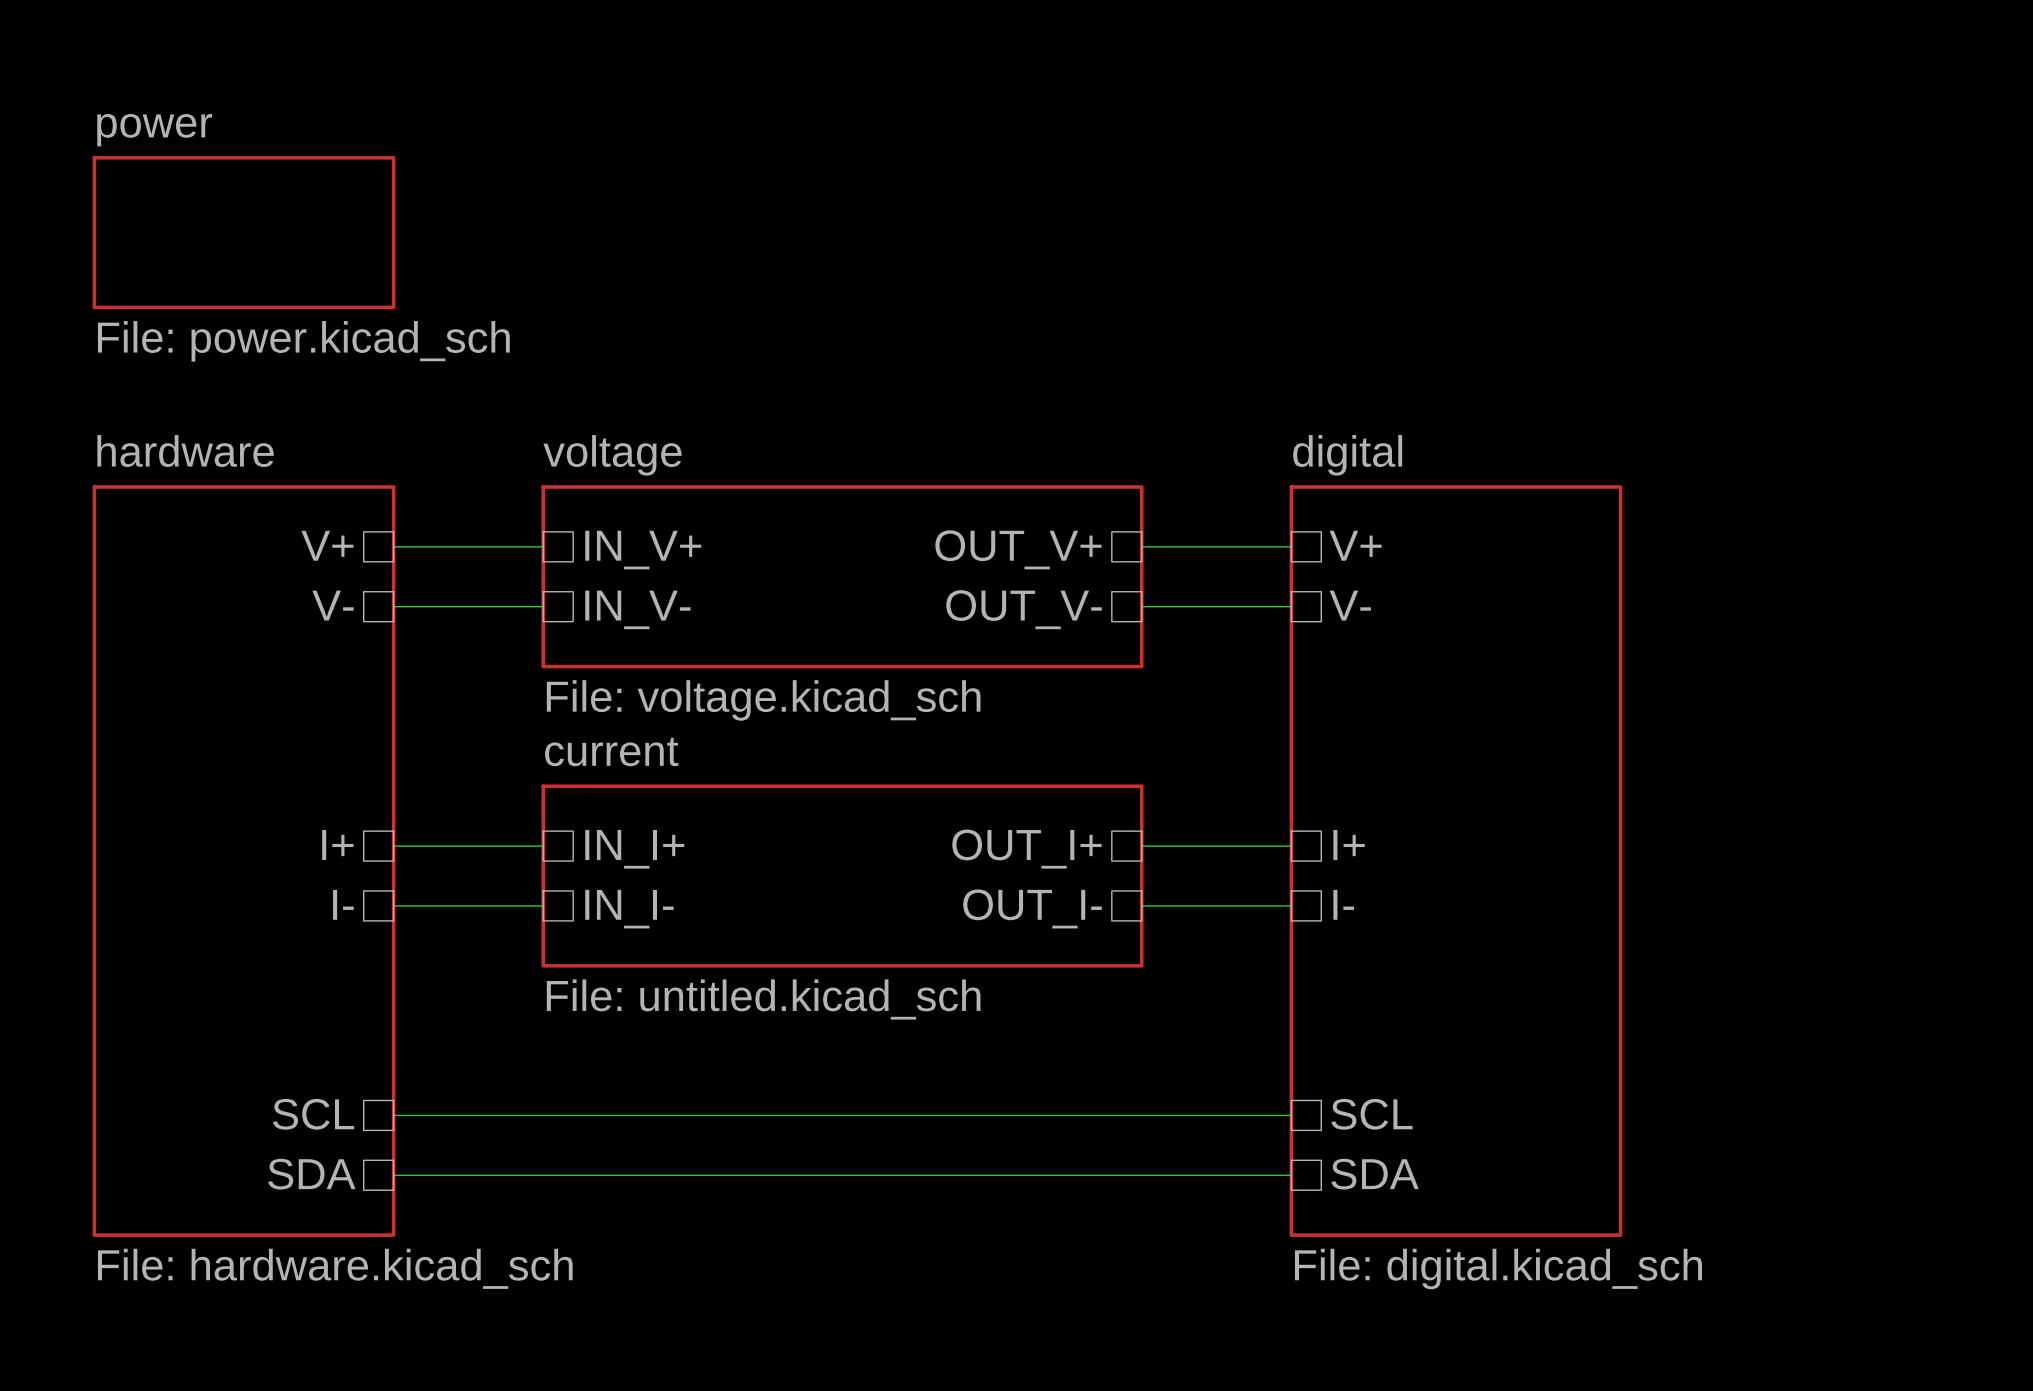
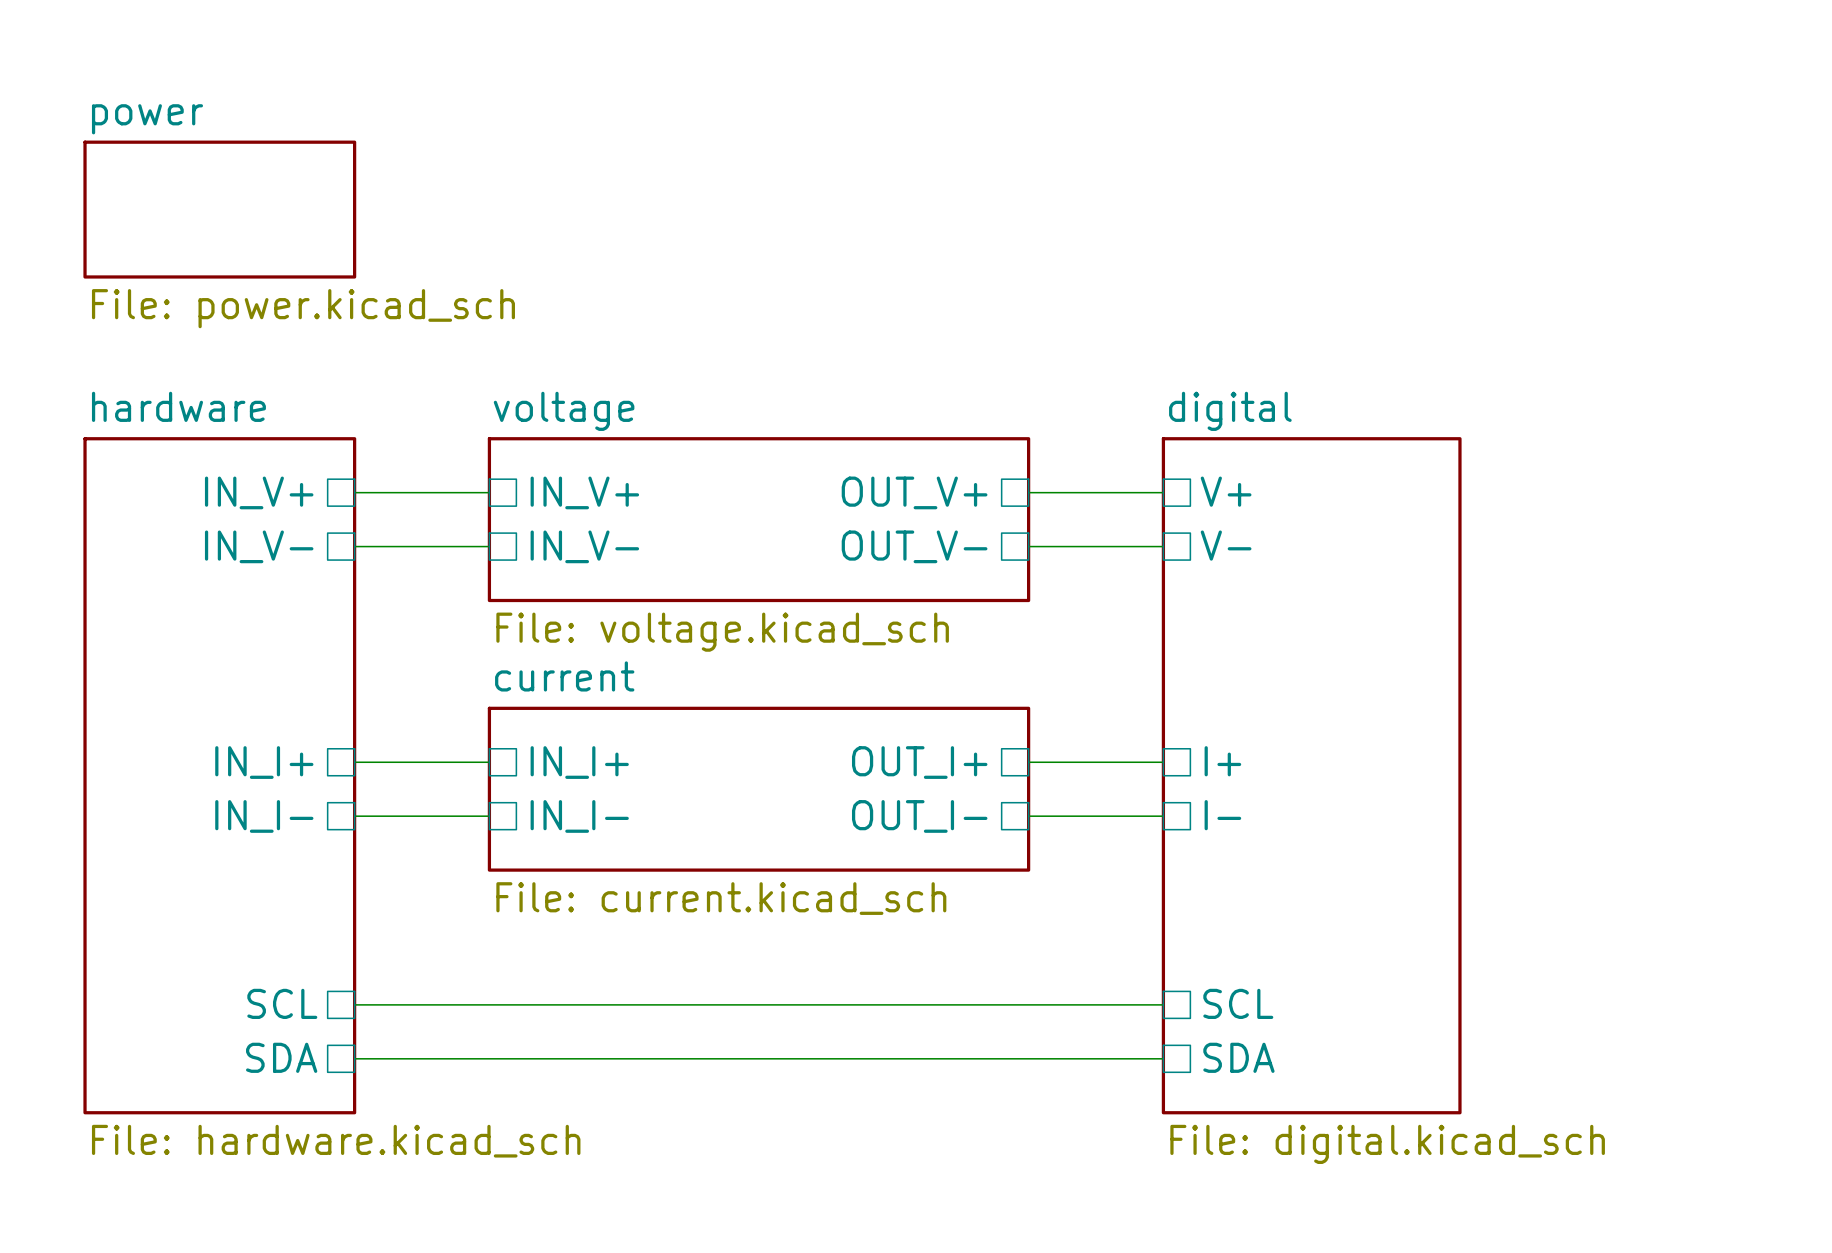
sheet pin: V+ (327, 545) -> IN_V+ (259, 492)
sheet pin: V- (332, 605) -> IN_V- (259, 546)
sheet pin: I+ (337, 844) -> IN_I+ (264, 762)
sheet pin: I- (343, 904) -> IN_I- (264, 816)
sheet current value: File: untitled.kicad_sch (763, 999) -> File: current.kicad_sch (721, 898)

